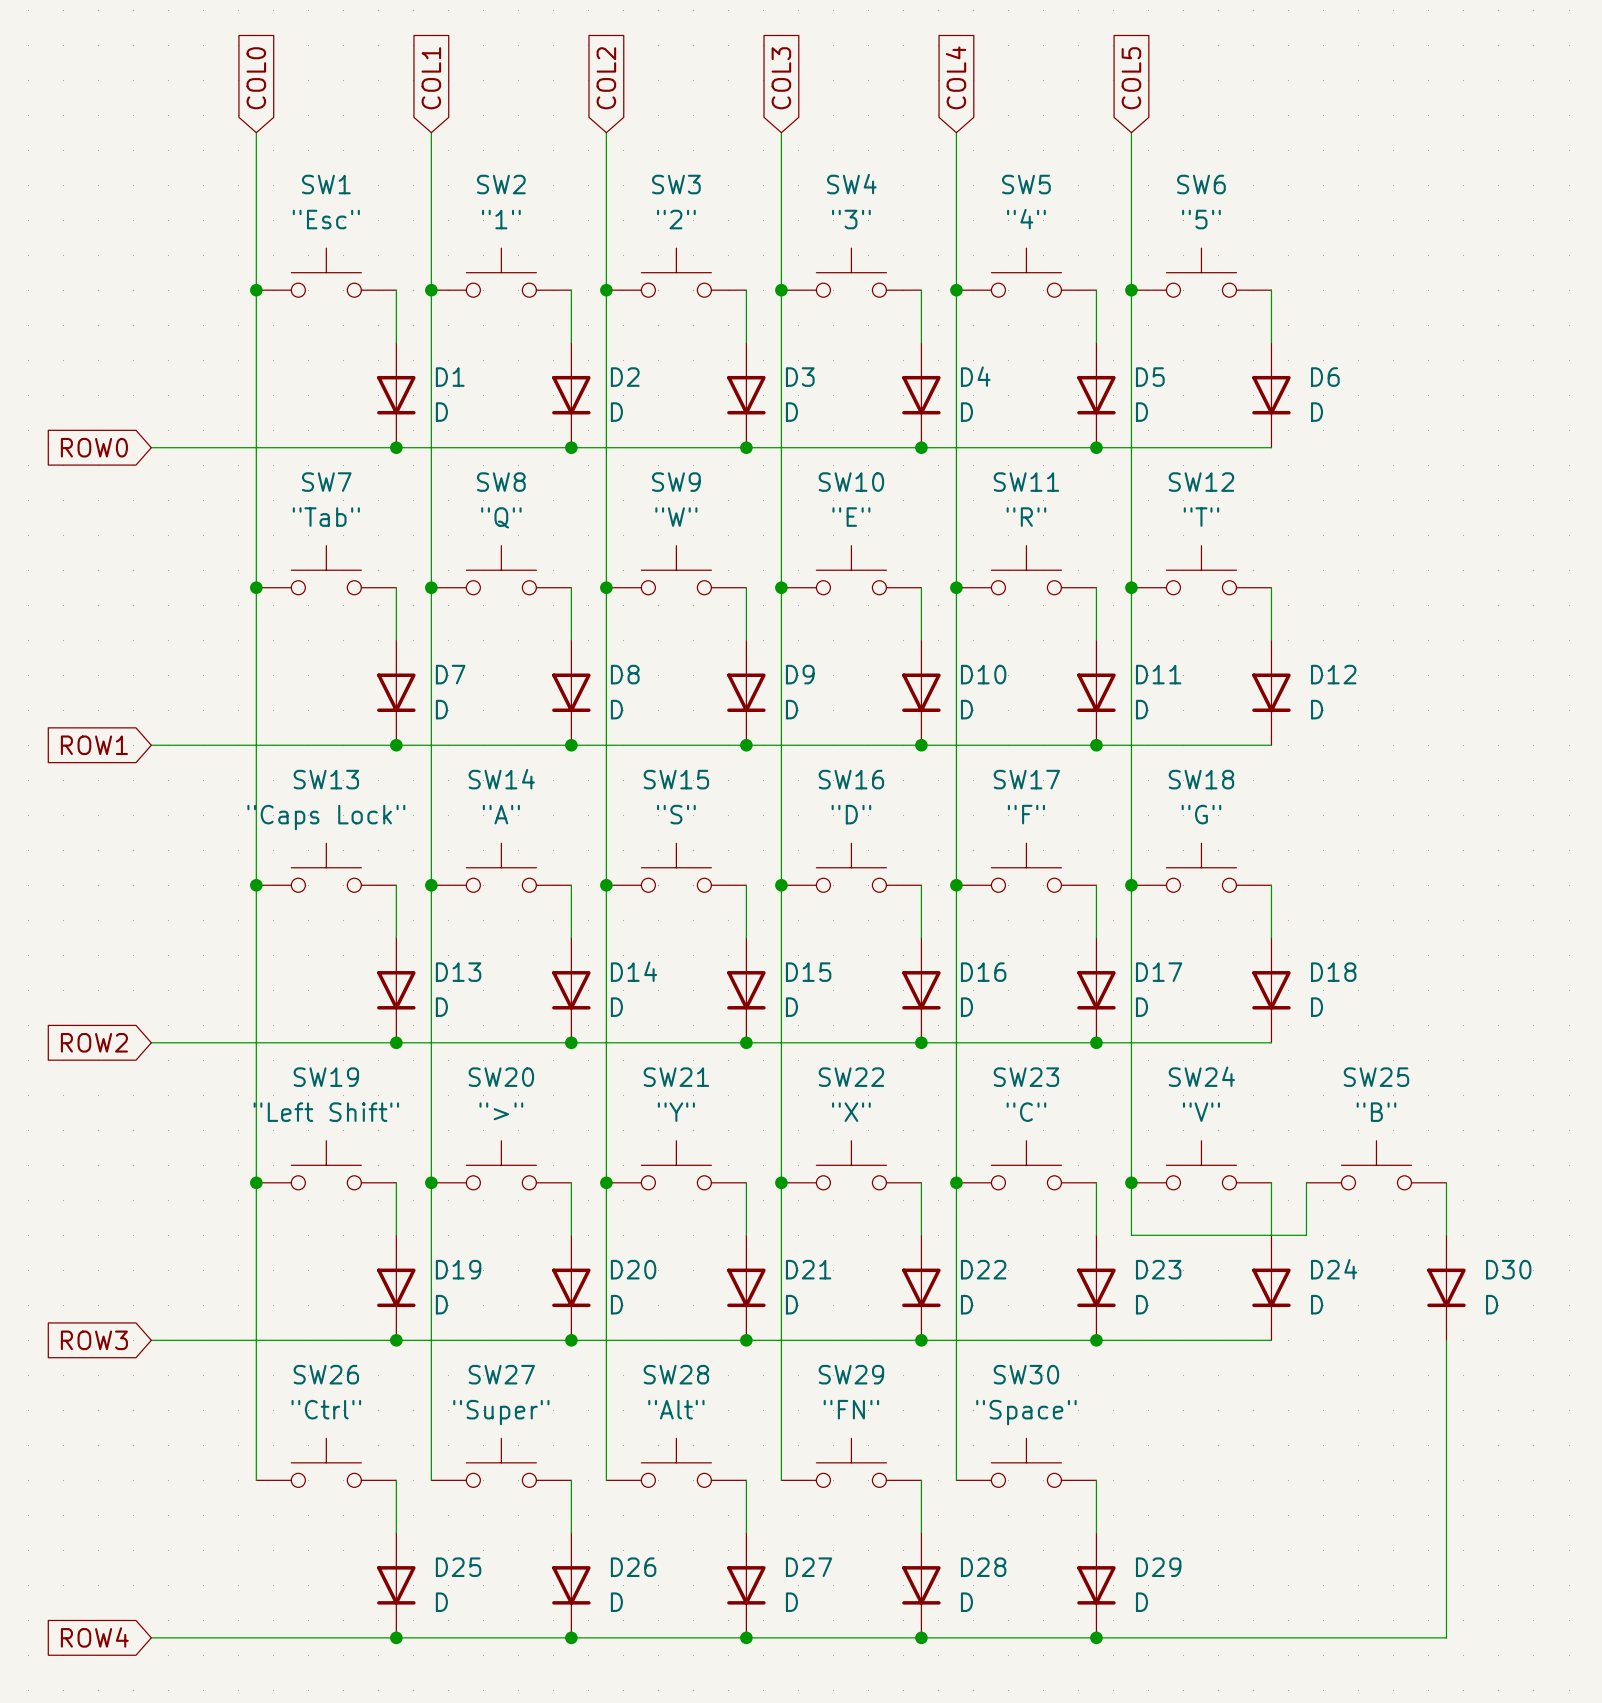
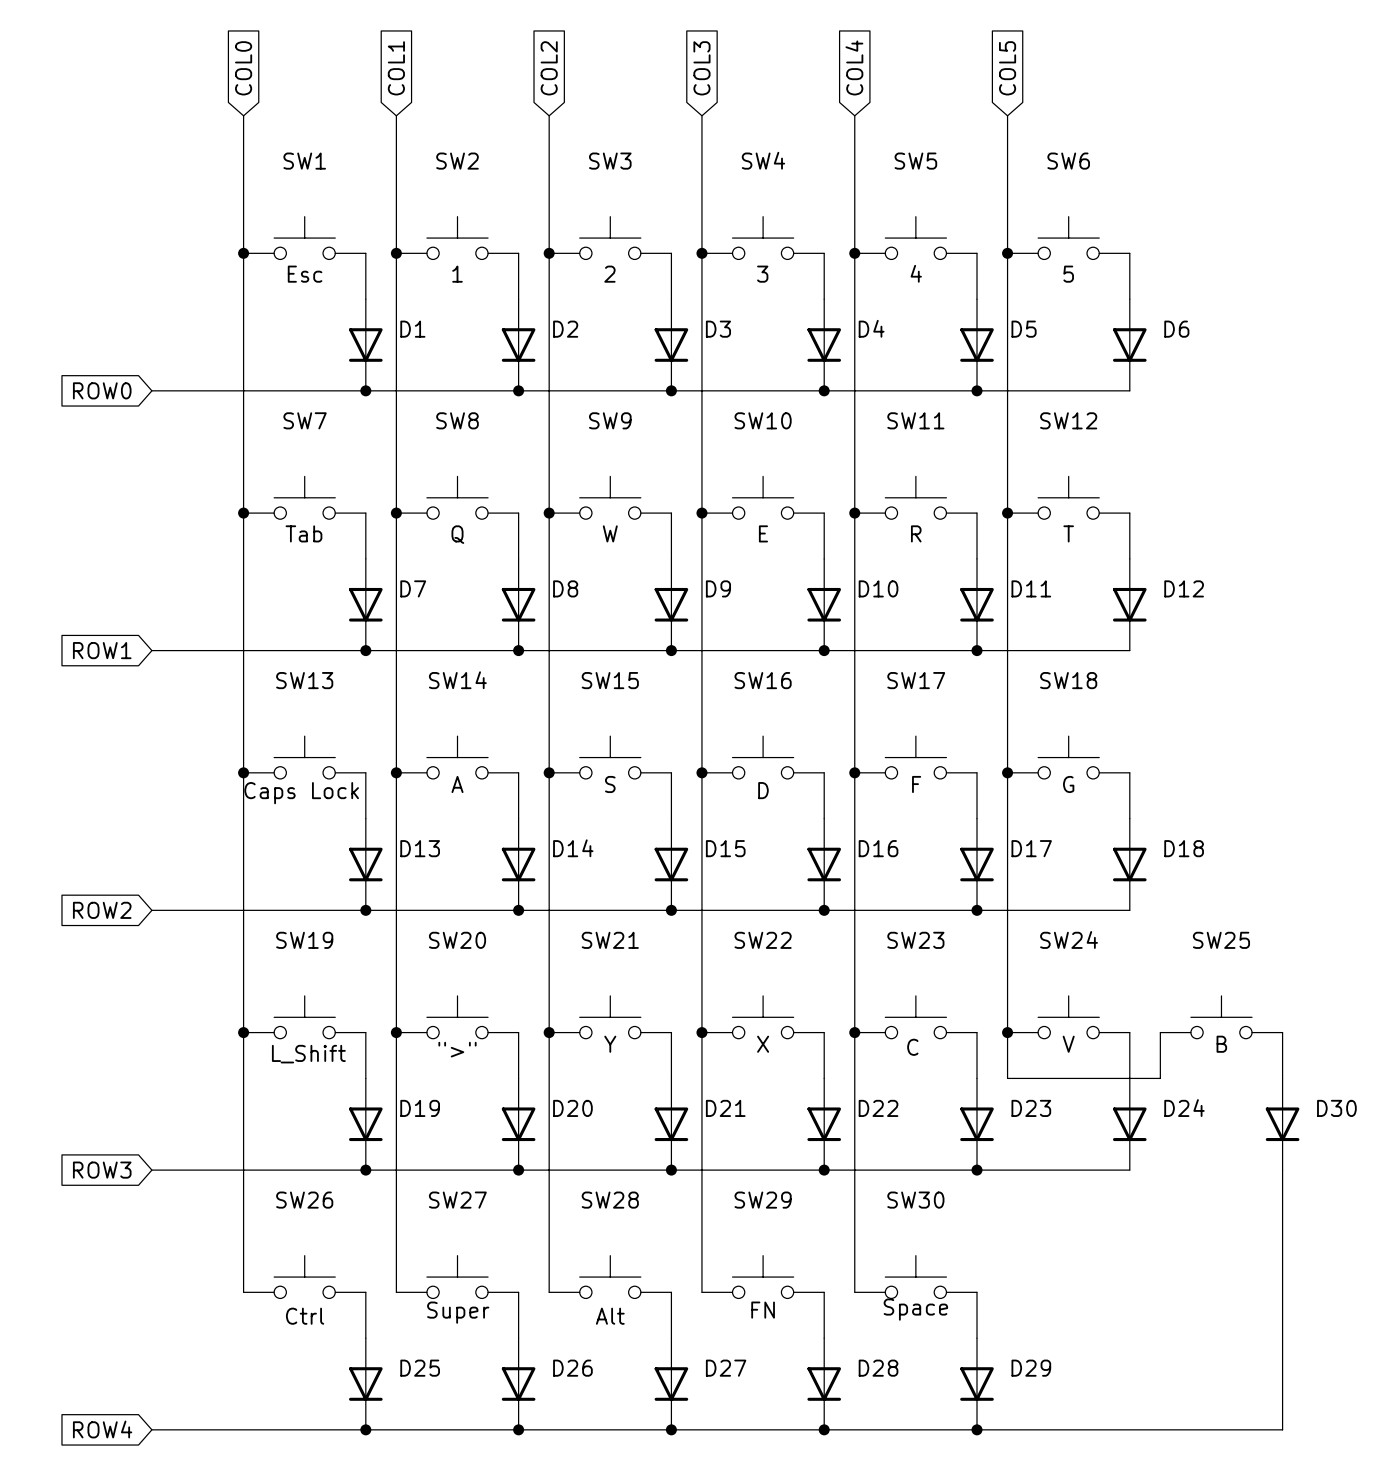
SW1 value: "Esc" (326, 219) -> none
SW2 value: "1" (501, 219) -> none
SW3 value: "2" (676, 219) -> none
SW4 value: "3" (851, 219) -> none
SW5 value: "4" (1026, 219) -> none
SW6 value: "5" (1201, 219) -> none
SW5 text: none -> 4 (916, 273)
SW1 text: none -> Esc (305, 274)
SW2 text: none -> 1 (457, 274)
SW3 text: none -> 2 (609, 274)
SW4 text: none -> 3 (762, 274)
SW6 text: none -> 5 (1068, 274)
D1 value: D (441, 412) -> none
D2 value: D (616, 412) -> none
D3 value: D (791, 412) -> none
D4 value: D (966, 412) -> none
D5 value: D (1141, 412) -> none
D6 value: D (1317, 412) -> none
SW7 value: "Tab" (326, 517) -> none
SW8 value: "Q" (501, 517) -> none
SW9 value: "W" (676, 517) -> none
SW10 value: "E" (851, 517) -> none
SW11 value: "R" (1026, 517) -> none
SW12 value: "T" (1201, 517) -> none
SW7 text: none -> Tab (303, 533)
SW9 text: none -> W (610, 533)
SW10 text: none -> E (763, 533)
SW11 text: none -> R (916, 533)
SW12 text: none -> T (1068, 533)
SW8 text: none -> Q (457, 534)
D7 value: D (441, 709) -> none
D8 value: D (616, 709) -> none
D9 value: D (791, 709) -> none
D10 value: D (966, 709) -> none
D11 value: D (1141, 709) -> none
D12 value: D (1317, 709) -> none
SW14 value: "A" (501, 814) -> none
SW15 value: "S" (676, 814) -> none
SW16 value: "D" (851, 814) -> none
SW17 value: "F" (1026, 814) -> none
SW18 value: "G" (1201, 814) -> none
SW13 value: "Caps Lock" (326, 817) -> none
SW14 text: none -> A (457, 784)
SW15 text: none -> S (610, 784)
SW17 text: none -> F (916, 784)
SW18 text: none -> G (1068, 784)
SW16 text: none -> D (763, 790)
SW13 text: none -> Caps Lock (301, 793)
D13 value: D (441, 1007) -> none
D14 value: D (616, 1007) -> none
D15 value: D (791, 1007) -> none
D16 value: D (966, 1007) -> none
D17 value: D (1141, 1007) -> none
D18 value: D (1317, 1007) -> none
SW20 value: ">" (501, 1111) -> none
SW19 value: "Left Shift" (326, 1112) -> none
SW21 value: "Y" (676, 1112) -> none
SW22 value: "X" (851, 1112) -> none
SW23 value: "C" (1026, 1112) -> none
SW24 value: "V" (1201, 1112) -> none
SW25 value: "B" (1376, 1112) -> none
SW21 text: none -> Y (610, 1044)
SW22 text: none -> X (763, 1044)
SW24 text: none -> V (1068, 1044)
SW25 text: none -> B (1221, 1044)
SW23 text: none -> C (912, 1047)
SW20 text: none -> ">" (457, 1049)
SW19 text: none -> L_Shift (308, 1054)
D19 value: D (441, 1304) -> none
D20 value: D (616, 1304) -> none
D21 value: D (791, 1304) -> none
D22 value: D (966, 1304) -> none
D23 value: D (1141, 1304) -> none
D24 value: D (1317, 1304) -> none
D30 value: D (1492, 1304) -> none
SW26 value: "Ctrl" (326, 1409) -> none
SW28 value: "Alt" (676, 1409) -> none
SW29 value: "FN" (851, 1409) -> none
SW27 value: "Super" (501, 1412) -> none
SW30 value: "Space" (1026, 1412) -> none
SW29 text: none -> FN (763, 1310)
SW30 text: none -> Space (915, 1309)
SW27 text: none -> Super (458, 1312)
SW26 text: none -> Ctrl (305, 1316)
SW28 text: none -> Alt (610, 1316)
D25 value: D (441, 1602) -> none
D26 value: D (616, 1602) -> none
D27 value: D (791, 1602) -> none
D28 value: D (966, 1602) -> none
D29 value: D (1141, 1602) -> none

